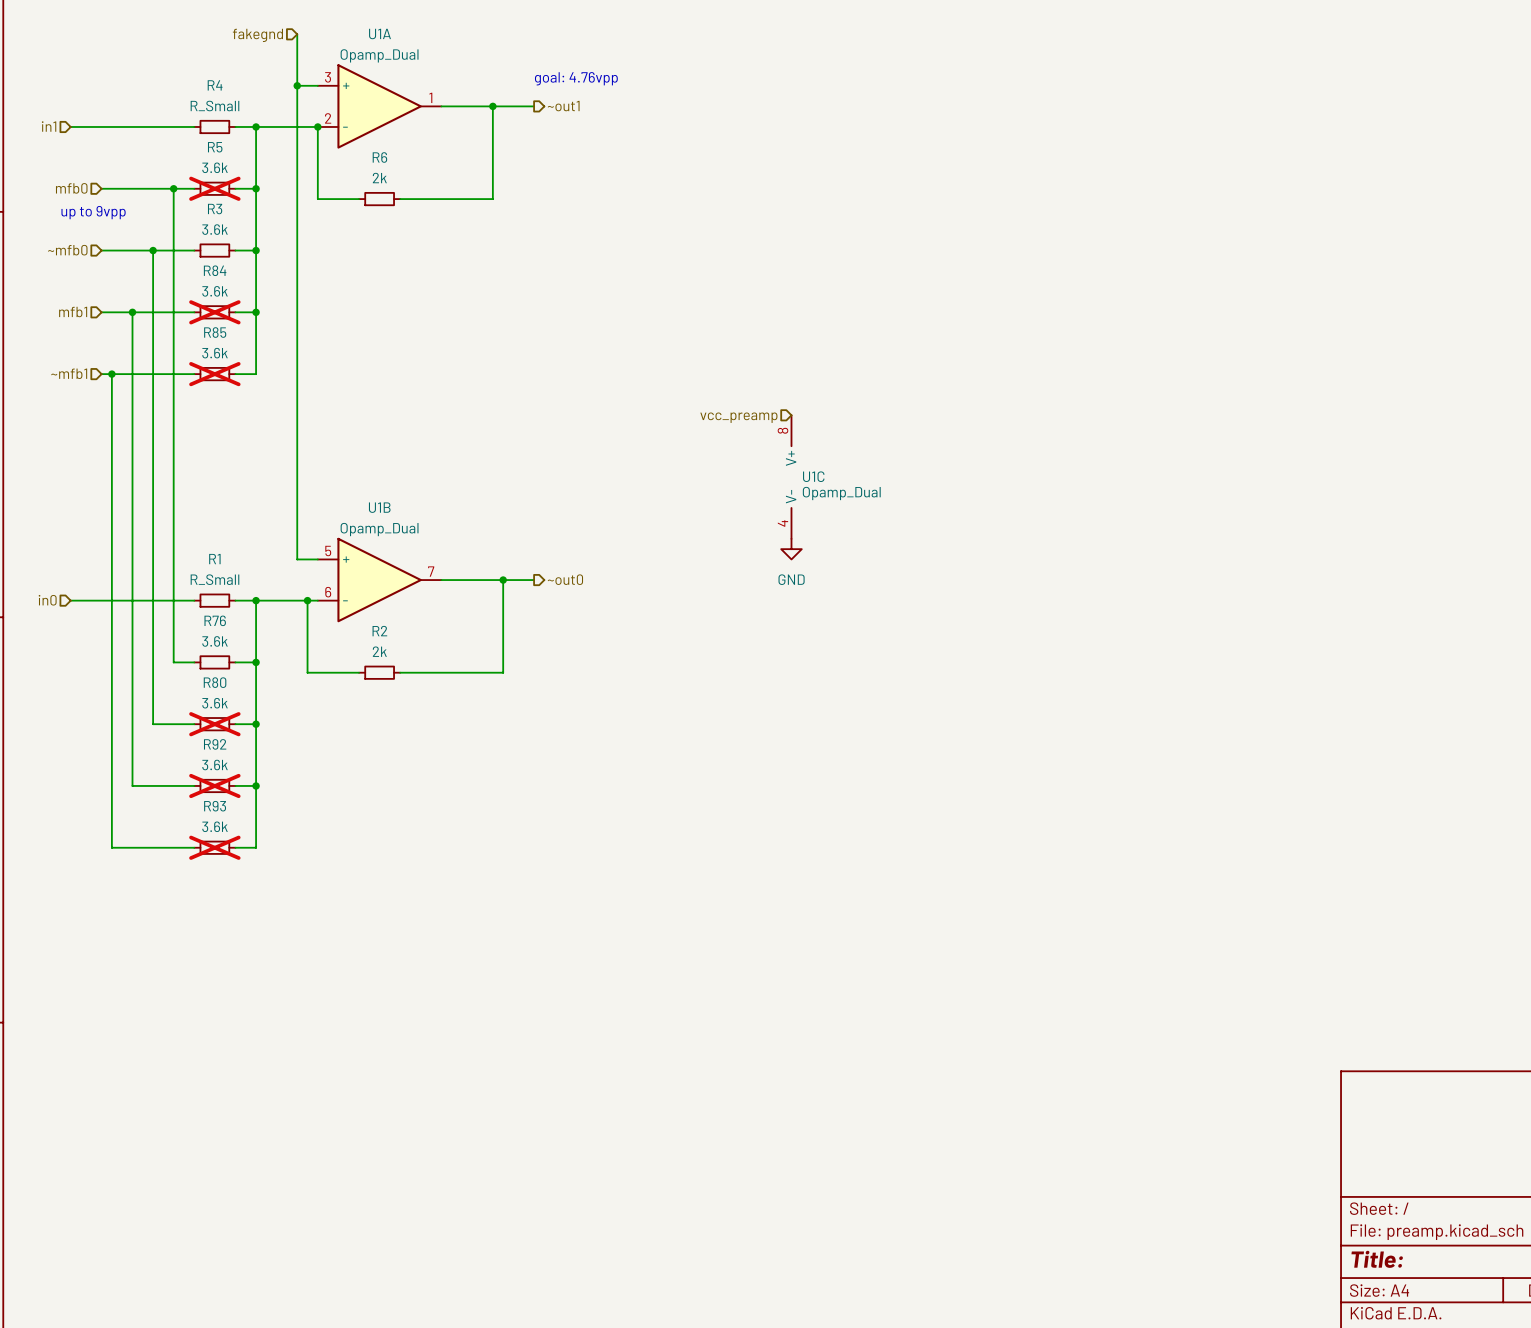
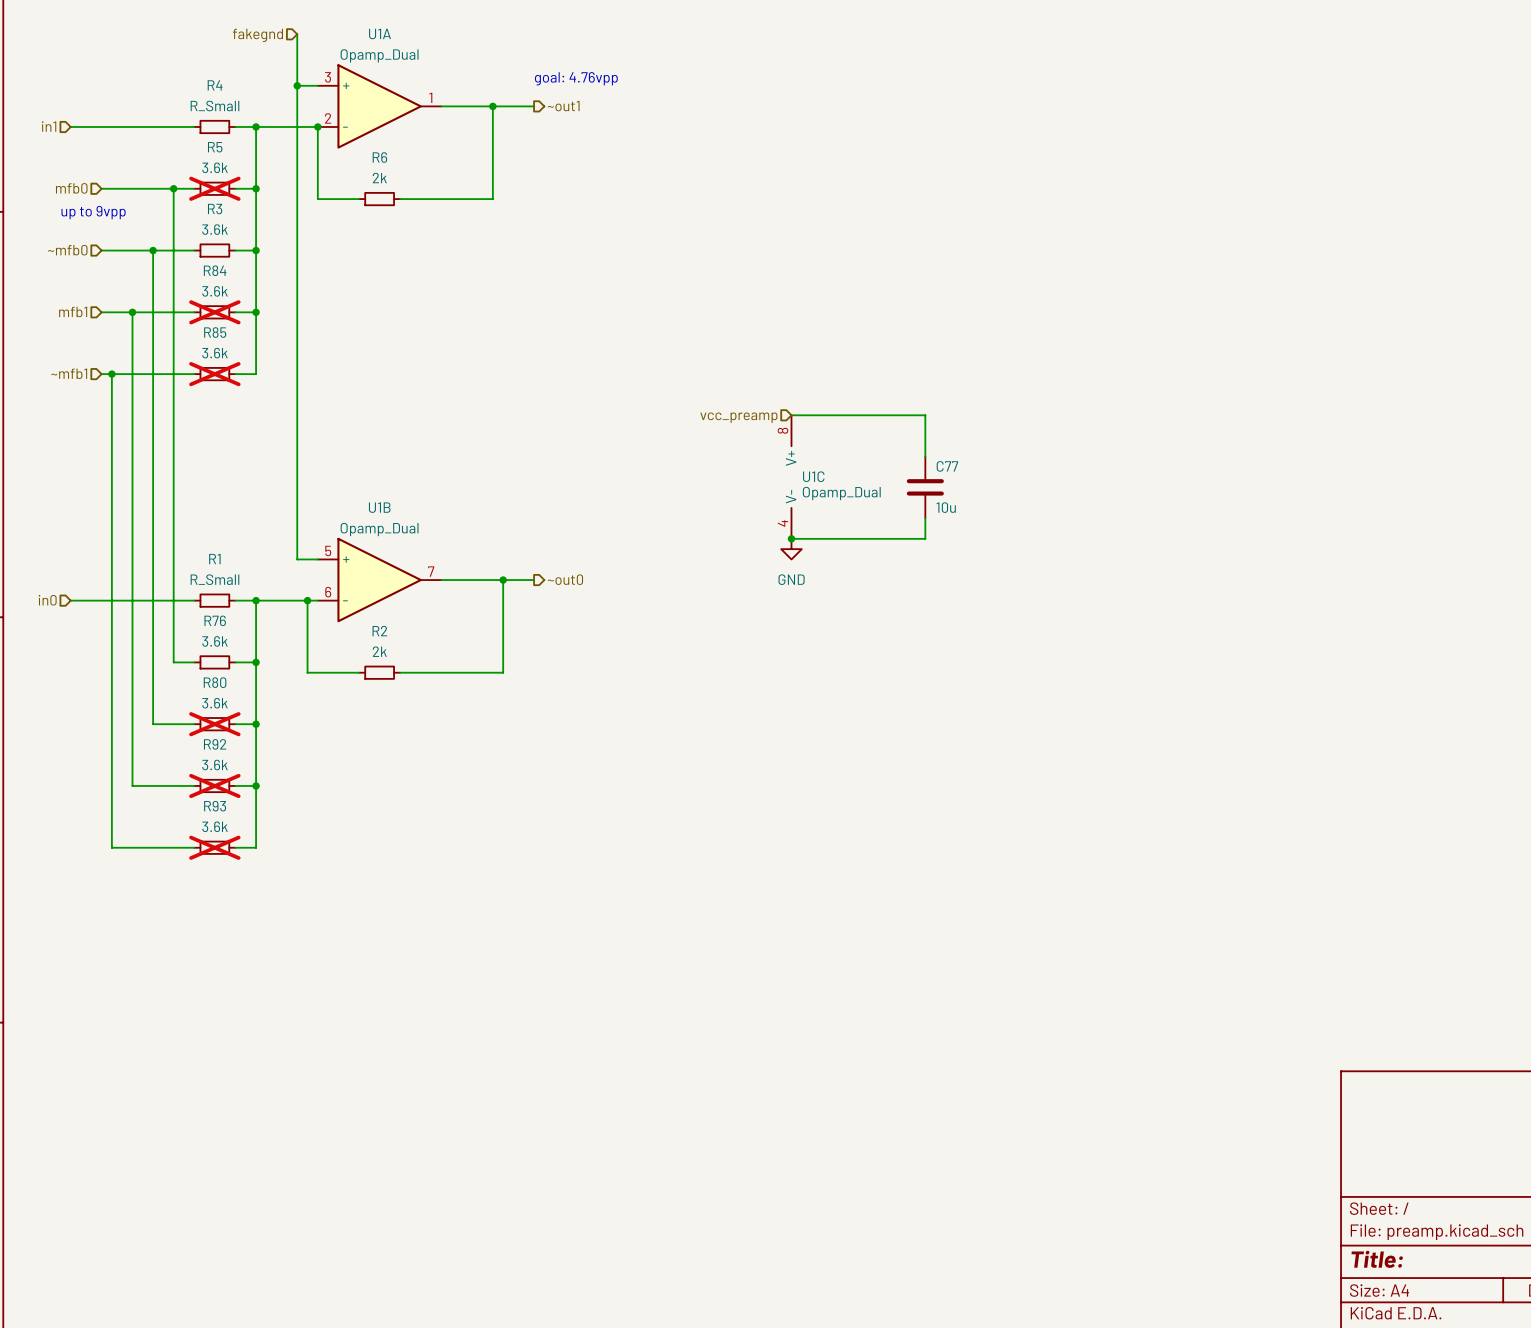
wire: none -> (791, 415) (925, 415) (925, 456)
C77: none -> 10u (925, 487)
wire: none -> (925, 518) (925, 538) (791, 538)
junction: none -> (791, 538)

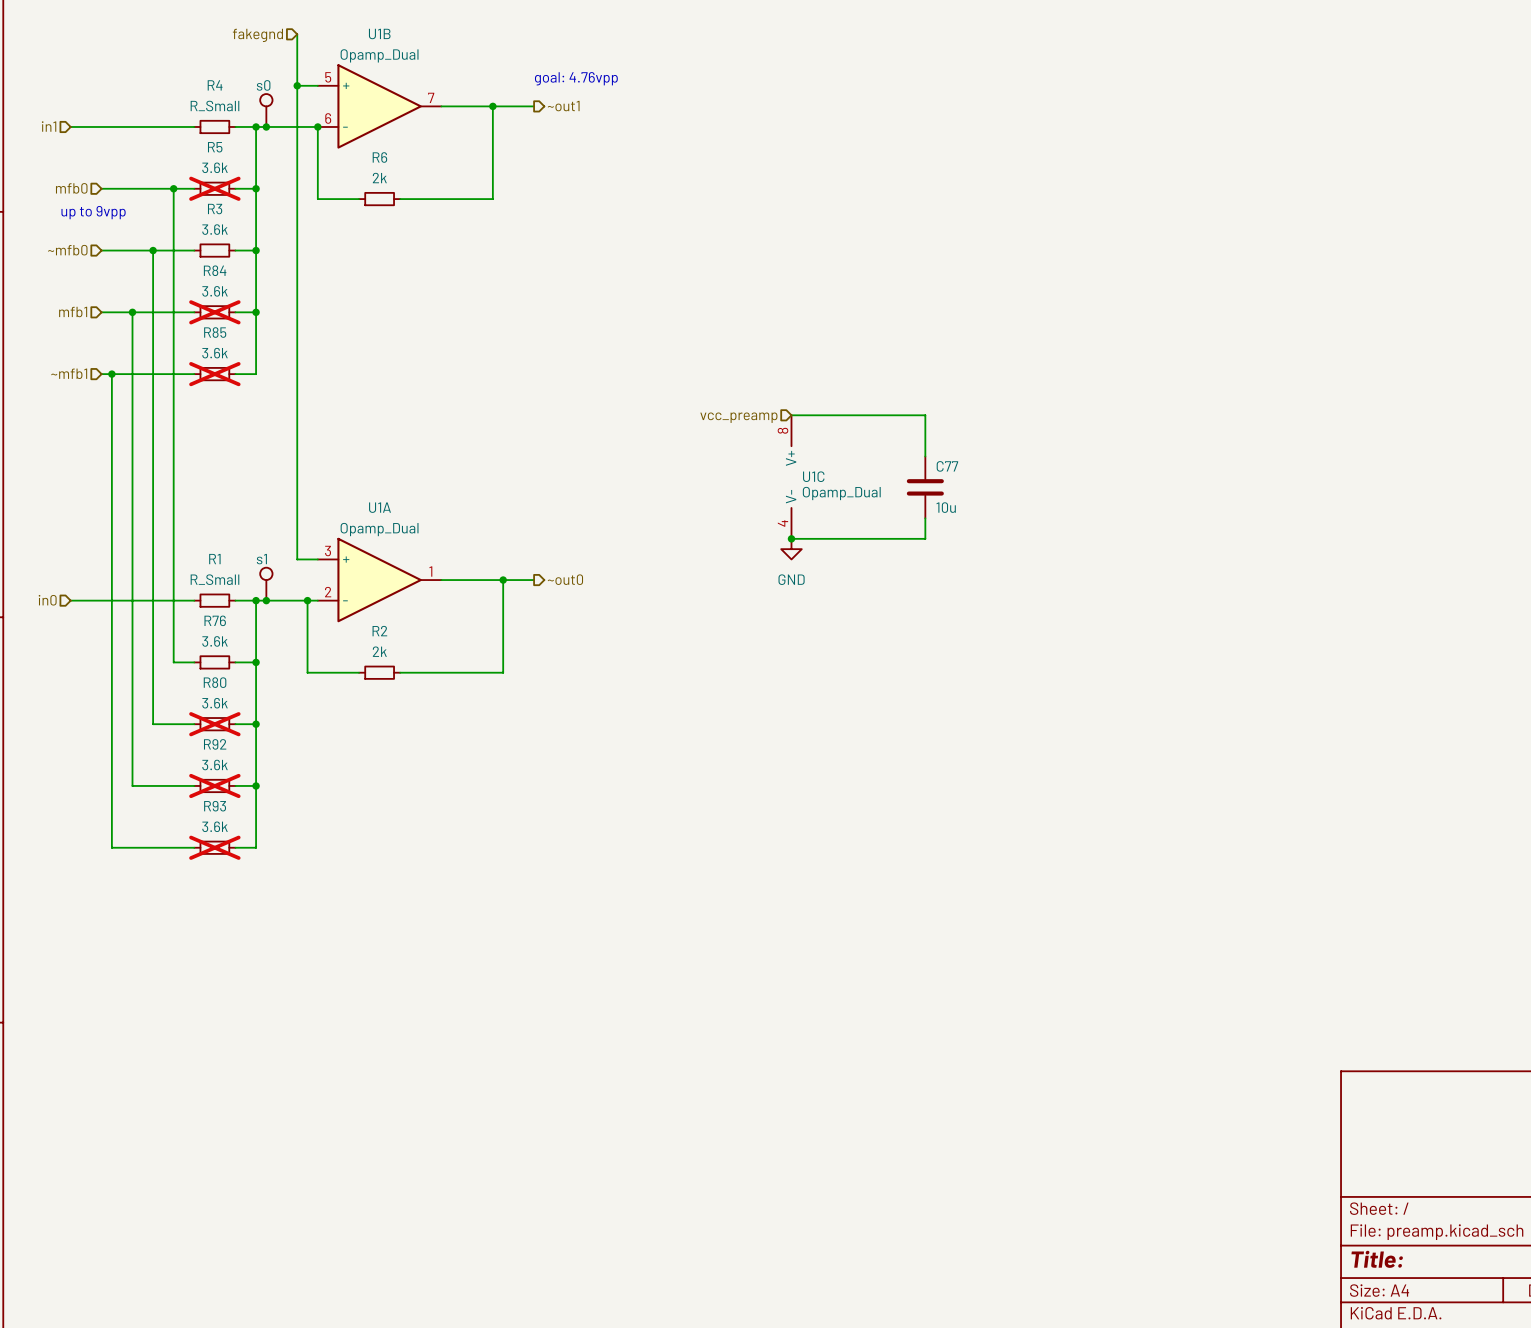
U1A position: (379, 106) -> (379, 580)
s0: none -> (266, 110)
junction: none -> (266, 126)
U1B position: (379, 580) -> (379, 106)
s1: none -> (266, 584)
junction: none -> (266, 600)

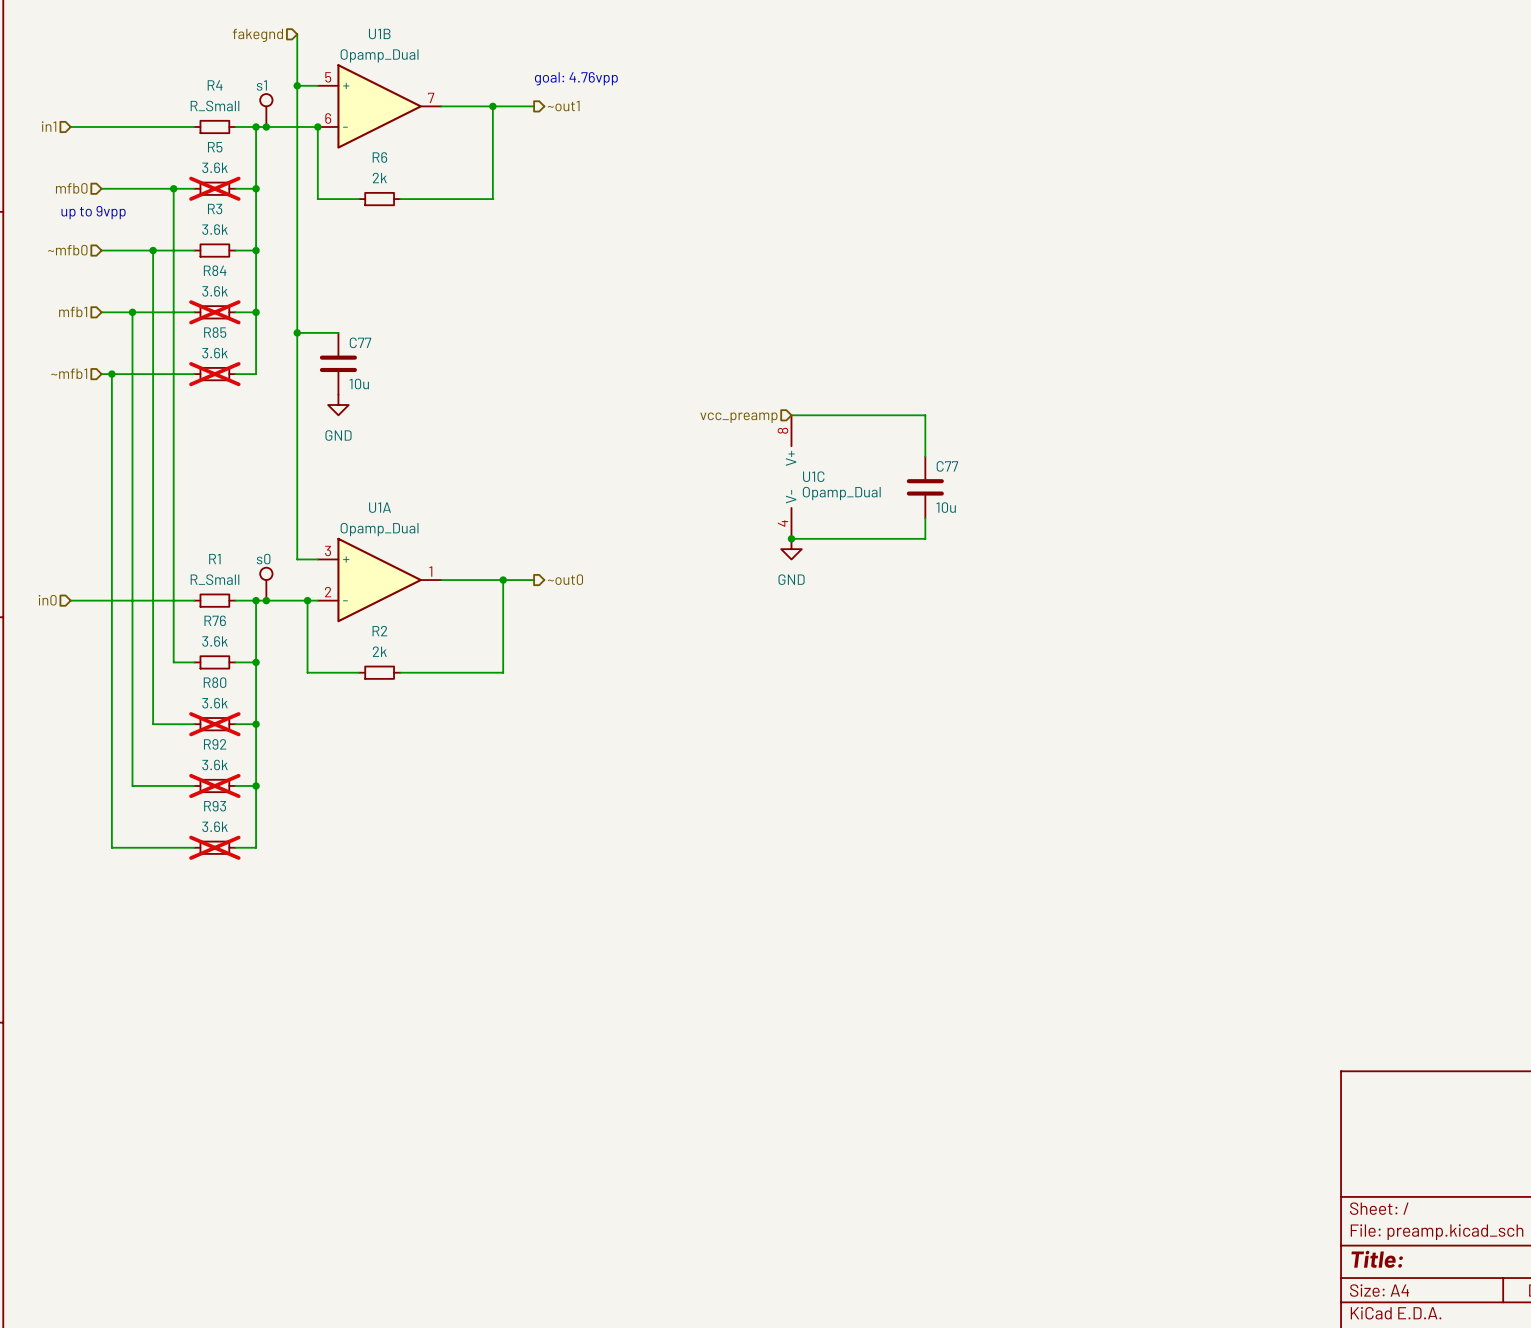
s0 name: s0 (263, 85) -> s1 (261, 85)
wire: none -> (297, 332) (338, 332)
junction: none -> (297, 332)
C77: none -> 10u (338, 363)
power symbol: none -> GND (338, 405)
s1 name: s1 (261, 559) -> s0 (263, 559)

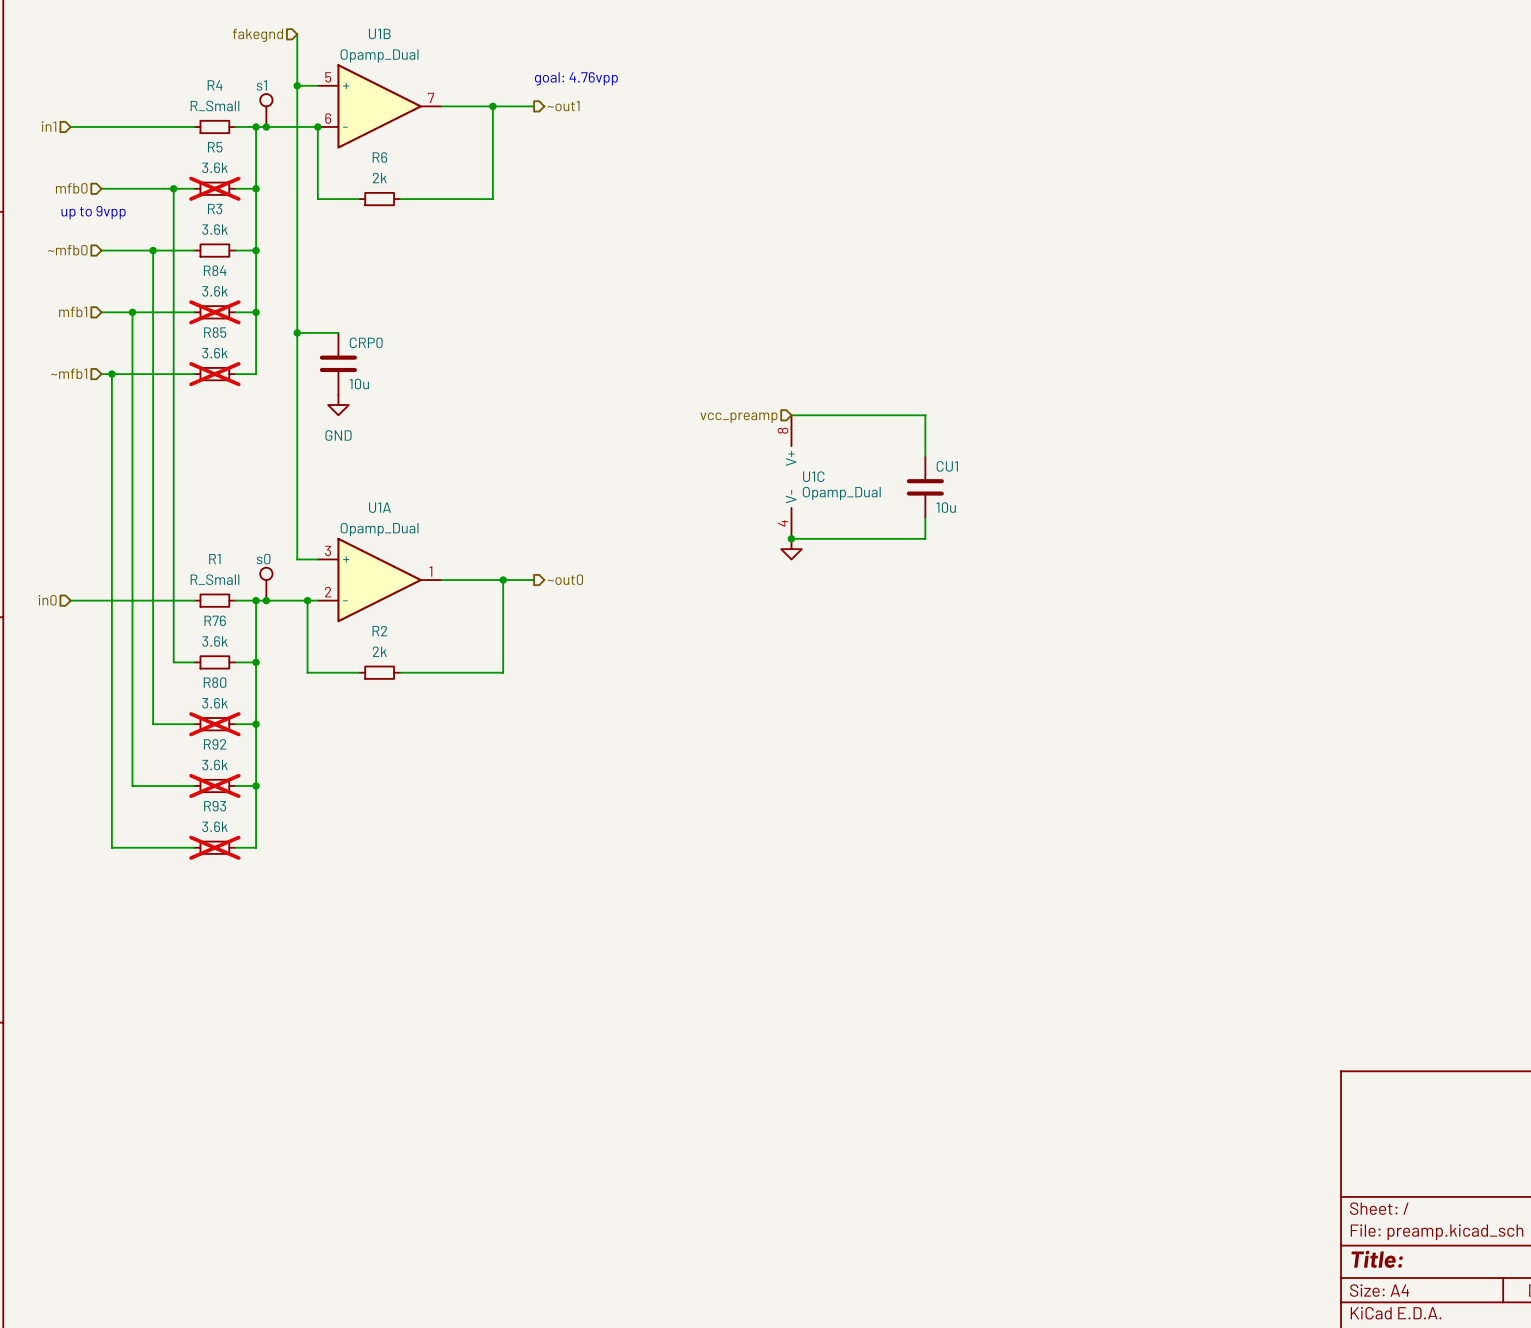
C77 name: C77 (360, 342) -> CRP0 (366, 342)
C77 name: C77 (947, 466) -> CU1 (947, 466)
power symbol text: GND (791, 579) -> none

